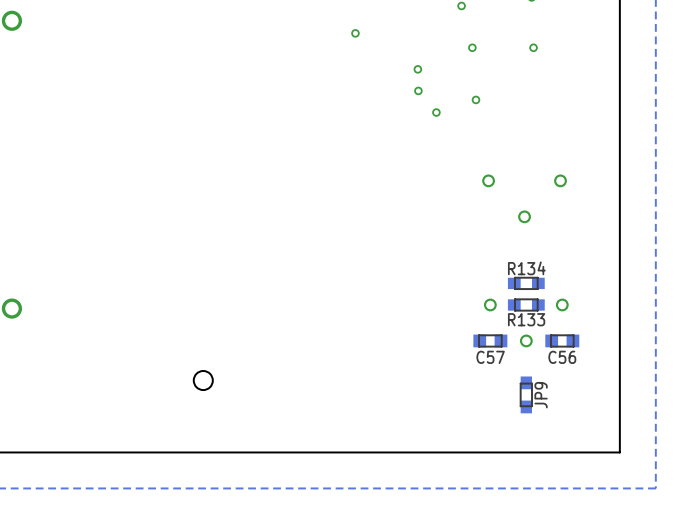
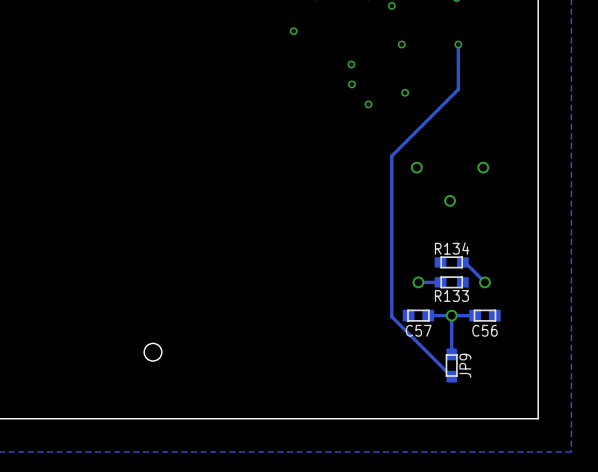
track: none -> (458, 44) (458, 89) (391, 155) (391, 316) (451, 376)
track: none -> (462, 262) (484, 282)
track: none -> (440, 282) (418, 282)
track: none -> (451, 315) (451, 354)
track: none -> (475, 315) (428, 315)

